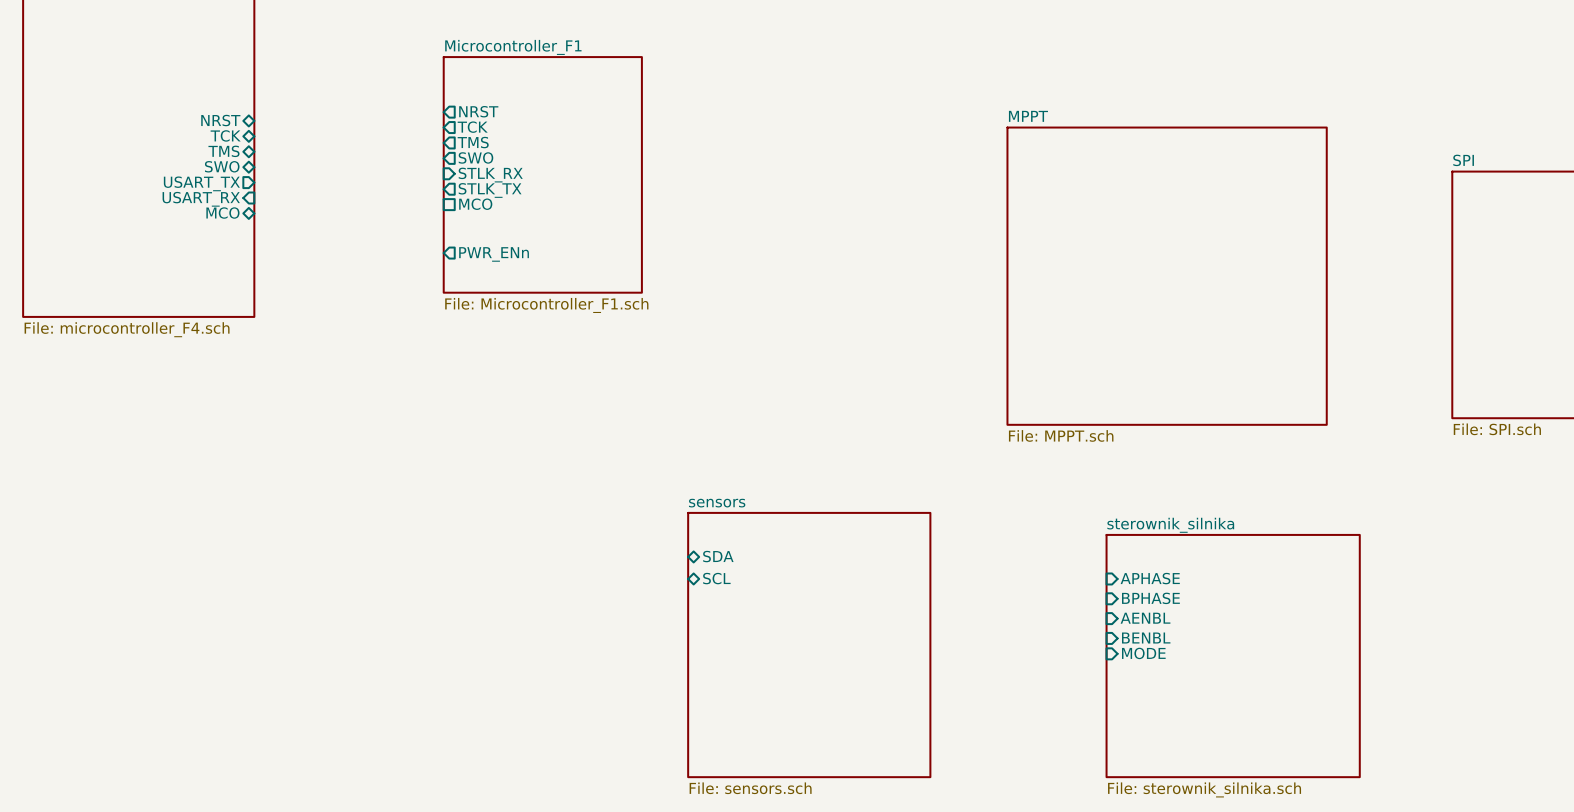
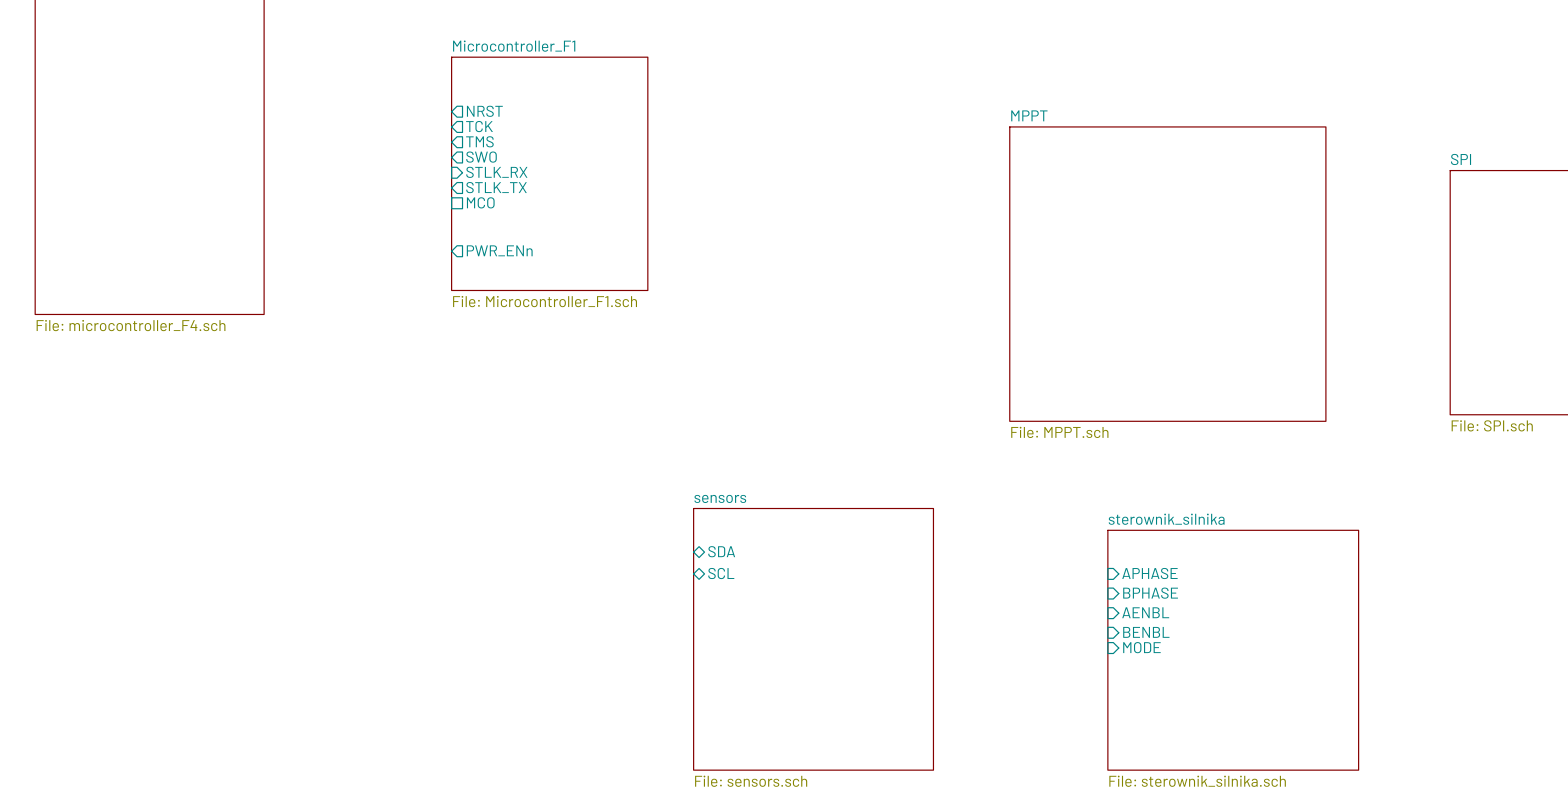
sheet pin: NRST (220, 120) -> none
sheet pin: TCK (225, 135) -> none
sheet pin: TMS (223, 151) -> none
sheet pin: SWO (222, 166) -> none
sheet pin: USART_TX (201, 183) -> none
sheet pin: USART_RX (201, 199) -> none
sheet pin: MCO (222, 213) -> none

